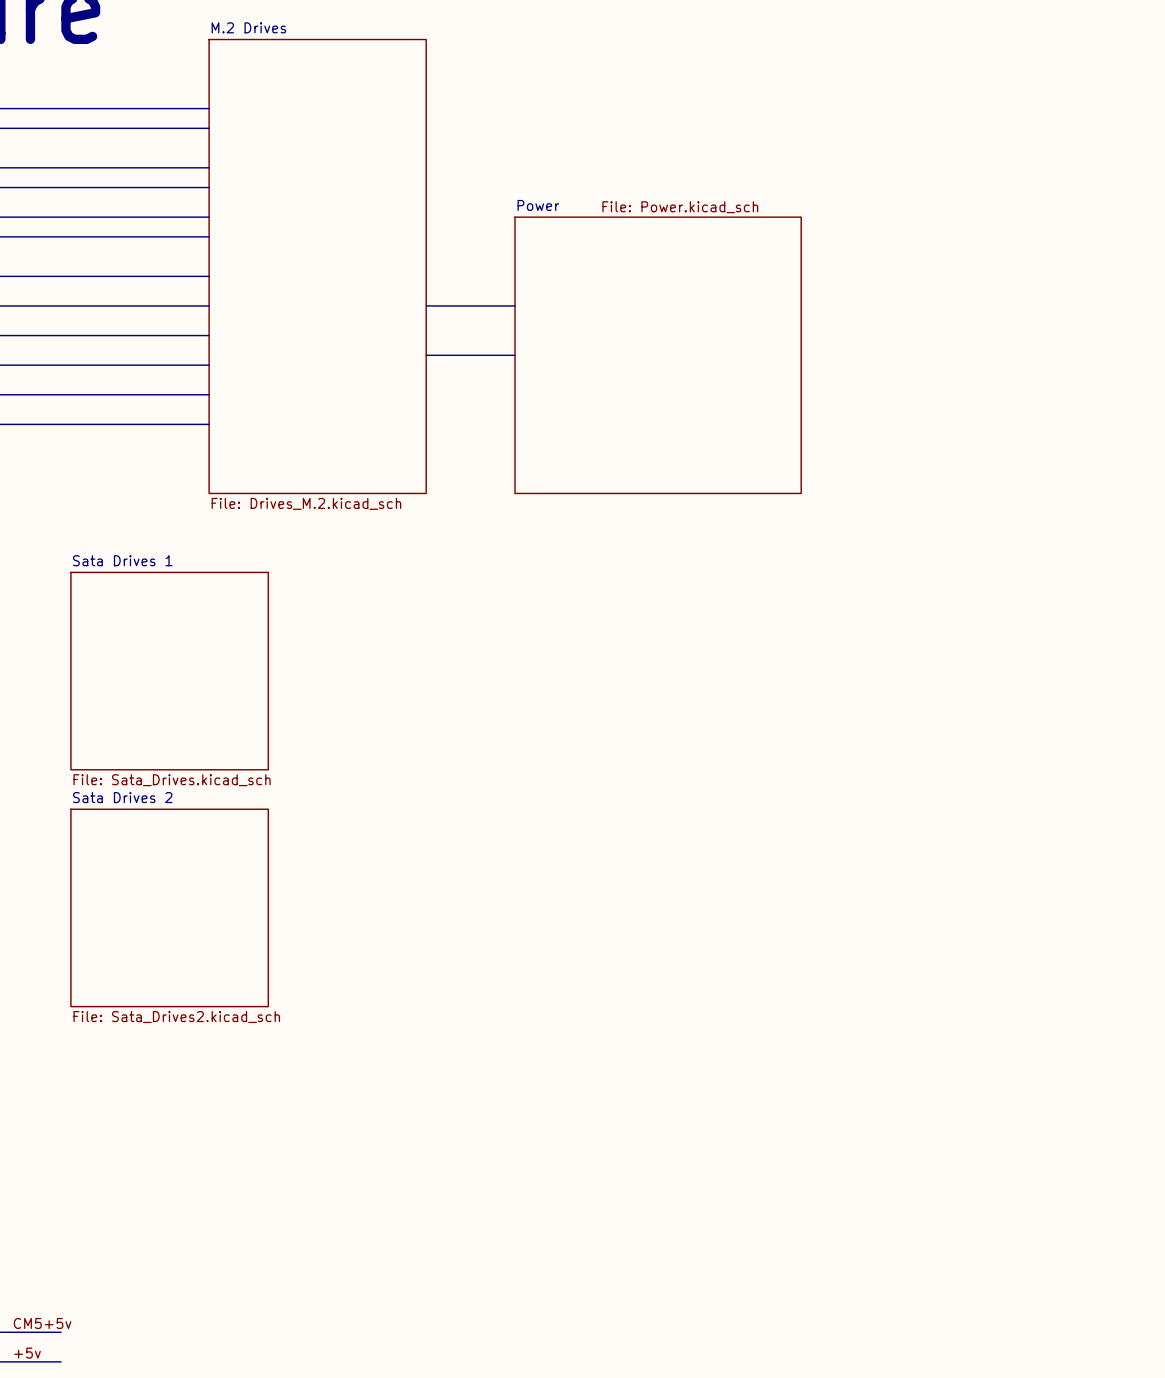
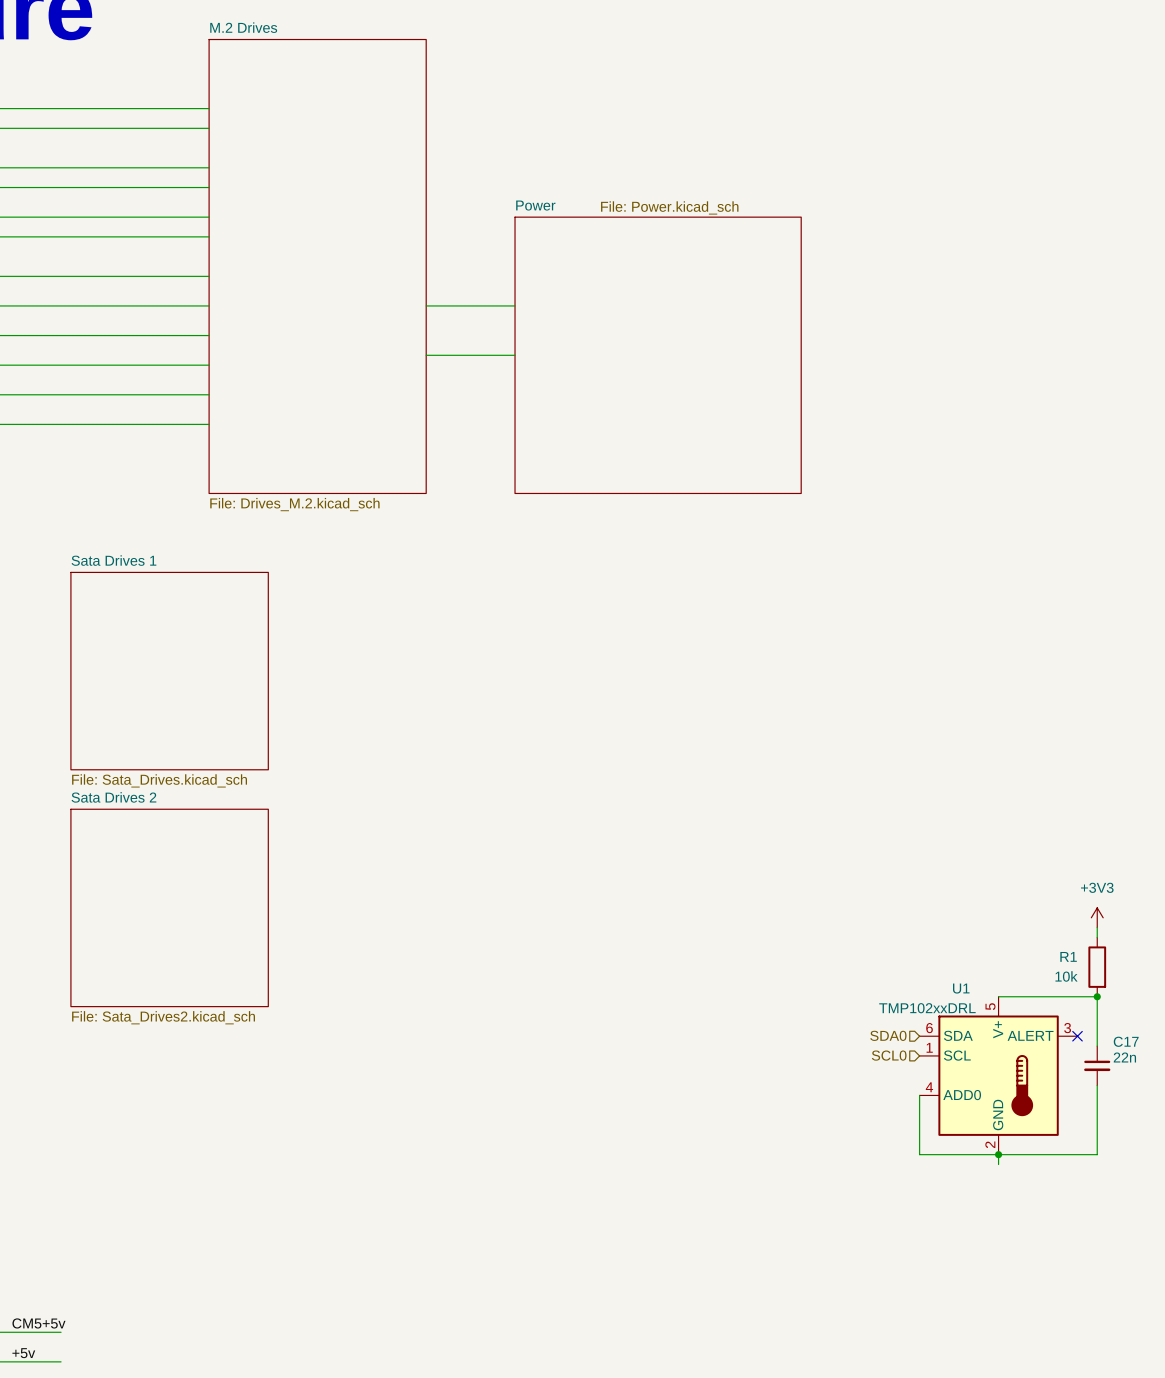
power symbol: none -> +3V3 (1097, 917)
wire: none -> (1097, 927) (1097, 937)
R1: none -> 10k (1097, 967)
wire: none -> (998, 996) (1097, 996) (1097, 1046)
junction: none -> (1097, 996)
hierarchical label: none -> SDA0 (888, 1035)
no-connect mark: none -> (1077, 1036)
hierarchical label: none -> SCL0 (889, 1055)
C17: none -> 22n (1097, 1065)
U1: none -> TMP102xxDRL (998, 1075)
wire: none -> (1097, 1085) (1097, 1154) (919, 1154) (919, 1095)
wire: none -> (998, 1154) (998, 1164)
junction: none -> (998, 1154)

